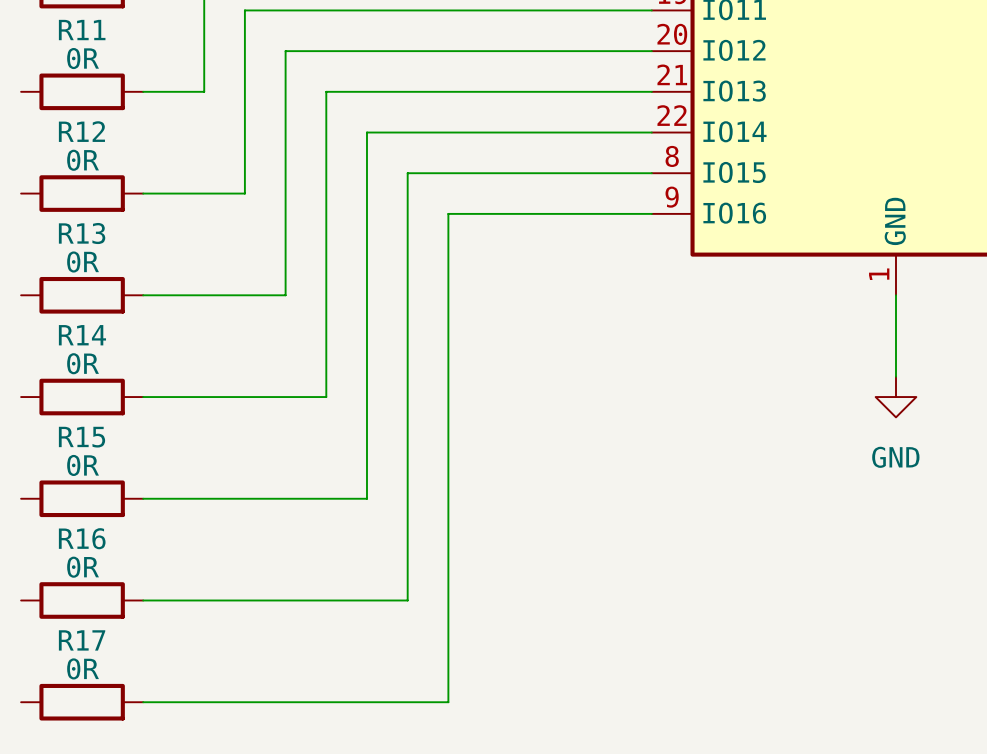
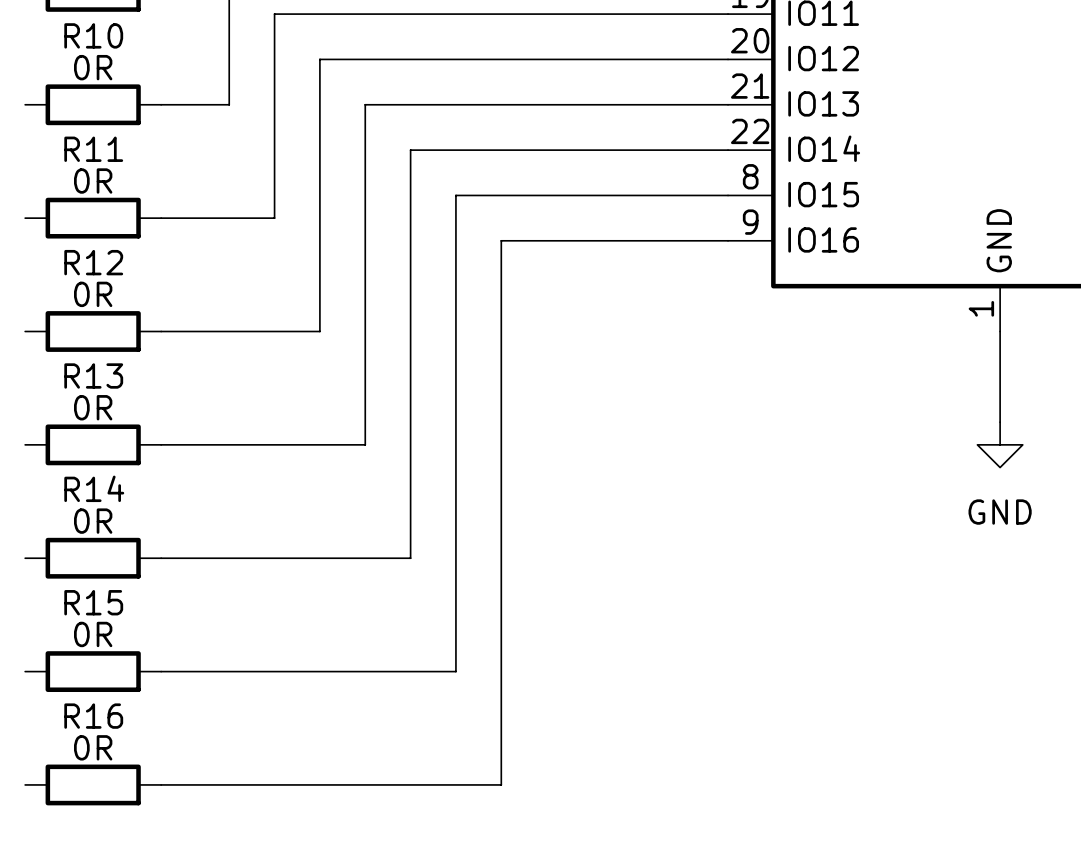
R11 name: R11 (82, 30) -> R10 (93, 35)
R12 name: R12 (81, 131) -> R11 (93, 149)
R13 name: R13 (82, 233) -> R12 (93, 262)
R14 name: R14 (82, 335) -> R13 (93, 376)
R15 name: R15 (82, 437) -> R14 (94, 488)
R16 name: R16 (82, 538) -> R15 (93, 602)
R17 name: R17 (82, 640) -> R16 (93, 716)

